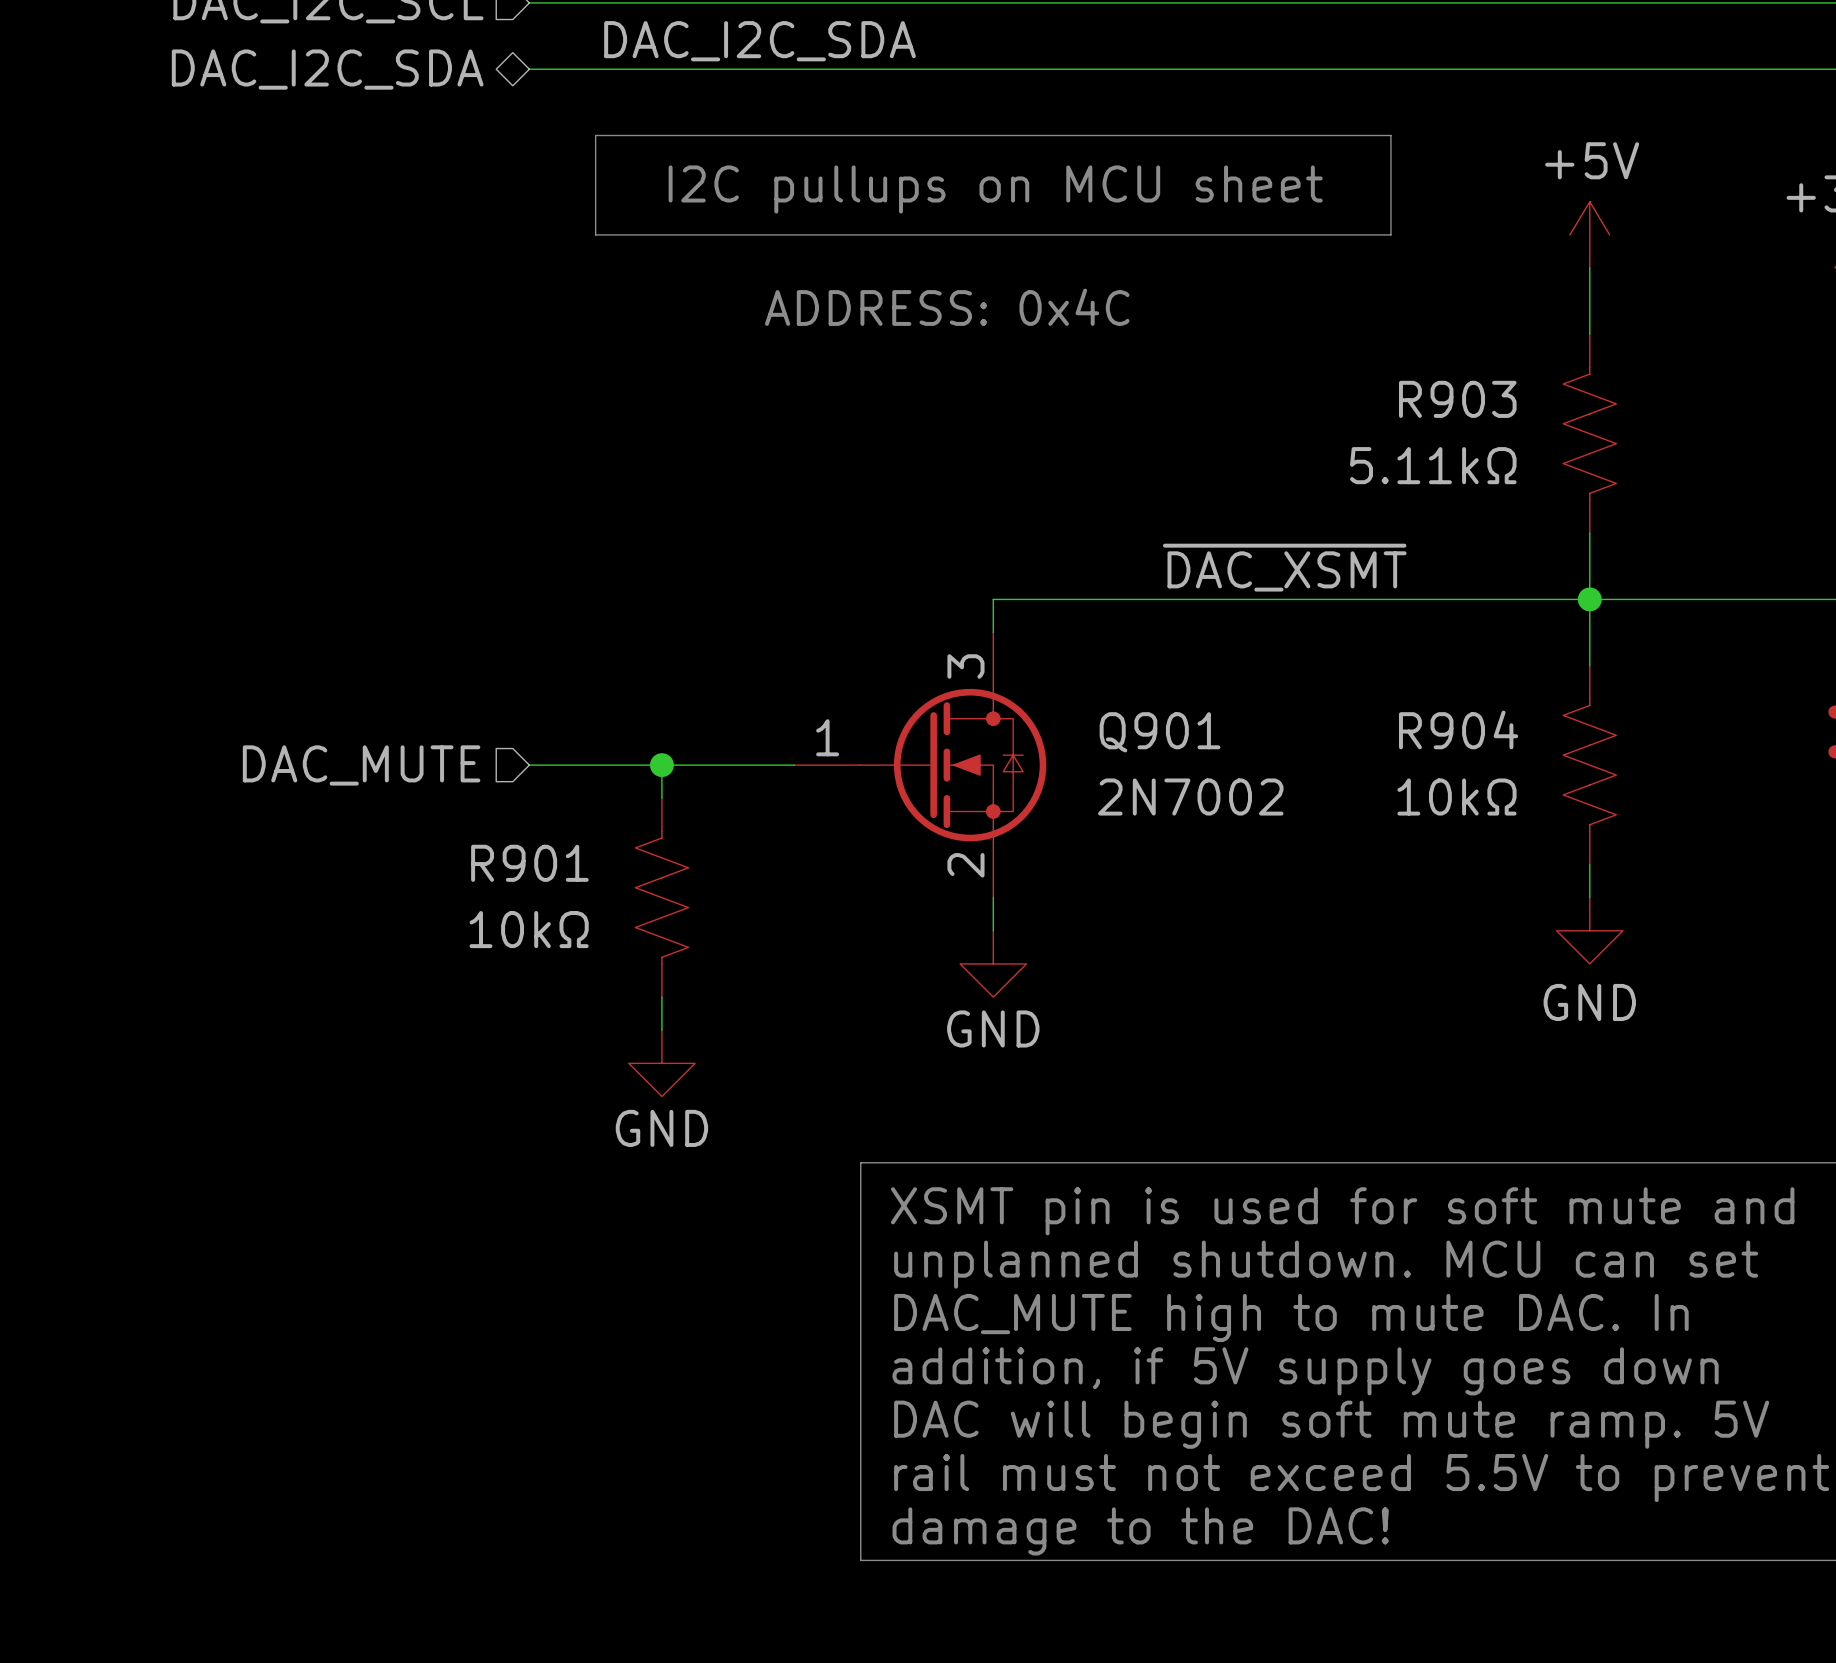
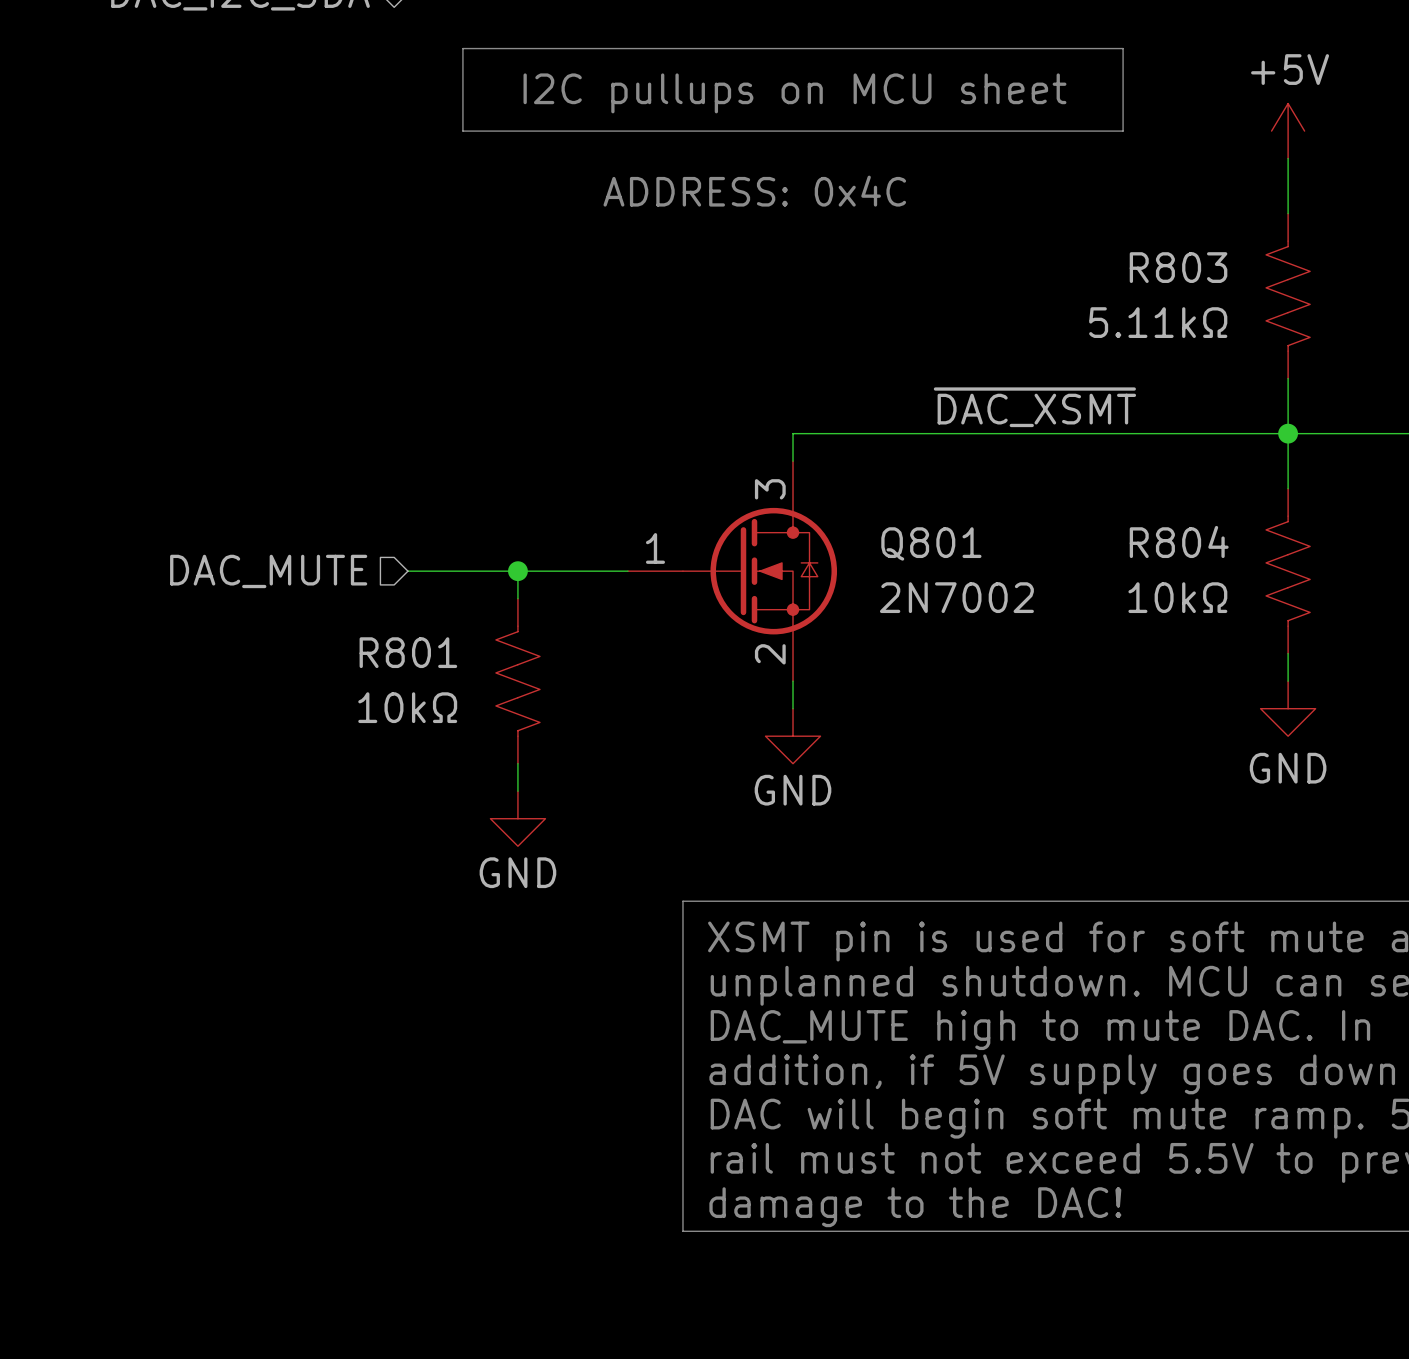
R903 name: R903 (1457, 399) -> R803 (1178, 267)
R904 name: R904 (1458, 729) -> R804 (1179, 541)
Q901 name: Q901 (1160, 732) -> Q801 (931, 543)
R901 name: R901 (529, 863) -> R801 (408, 652)

